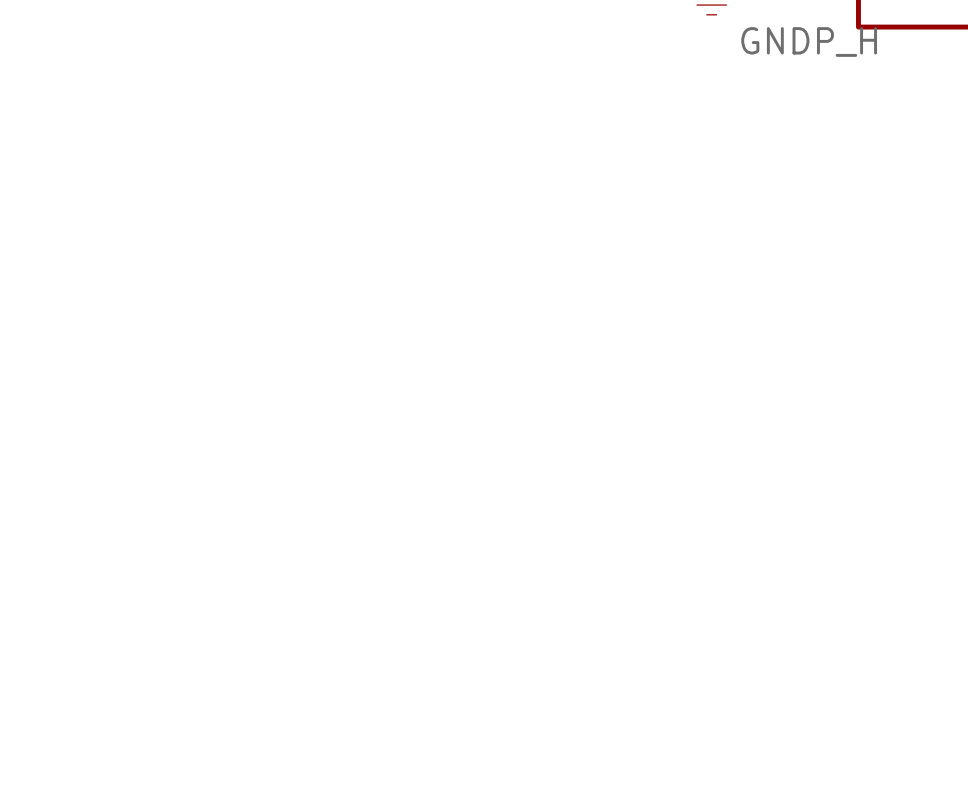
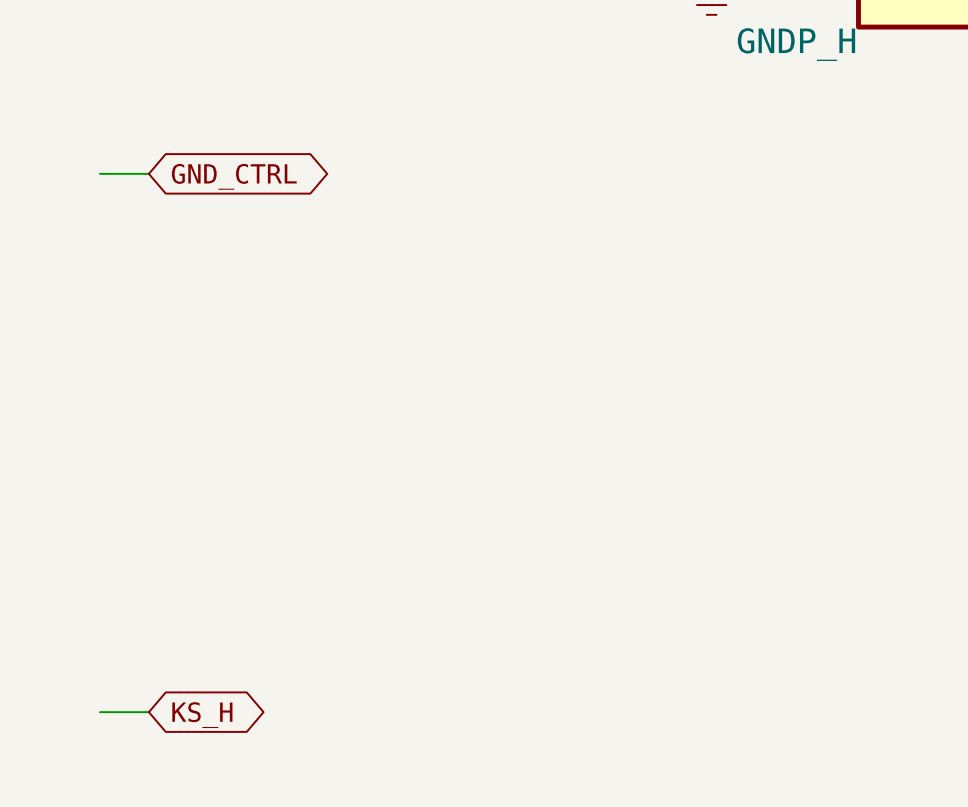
wire: none -> (99, 173) (148, 173)
global label: none -> GND_CTRL (234, 176)
wire: none -> (99, 712) (148, 712)
global label: none -> KS_H (202, 715)

